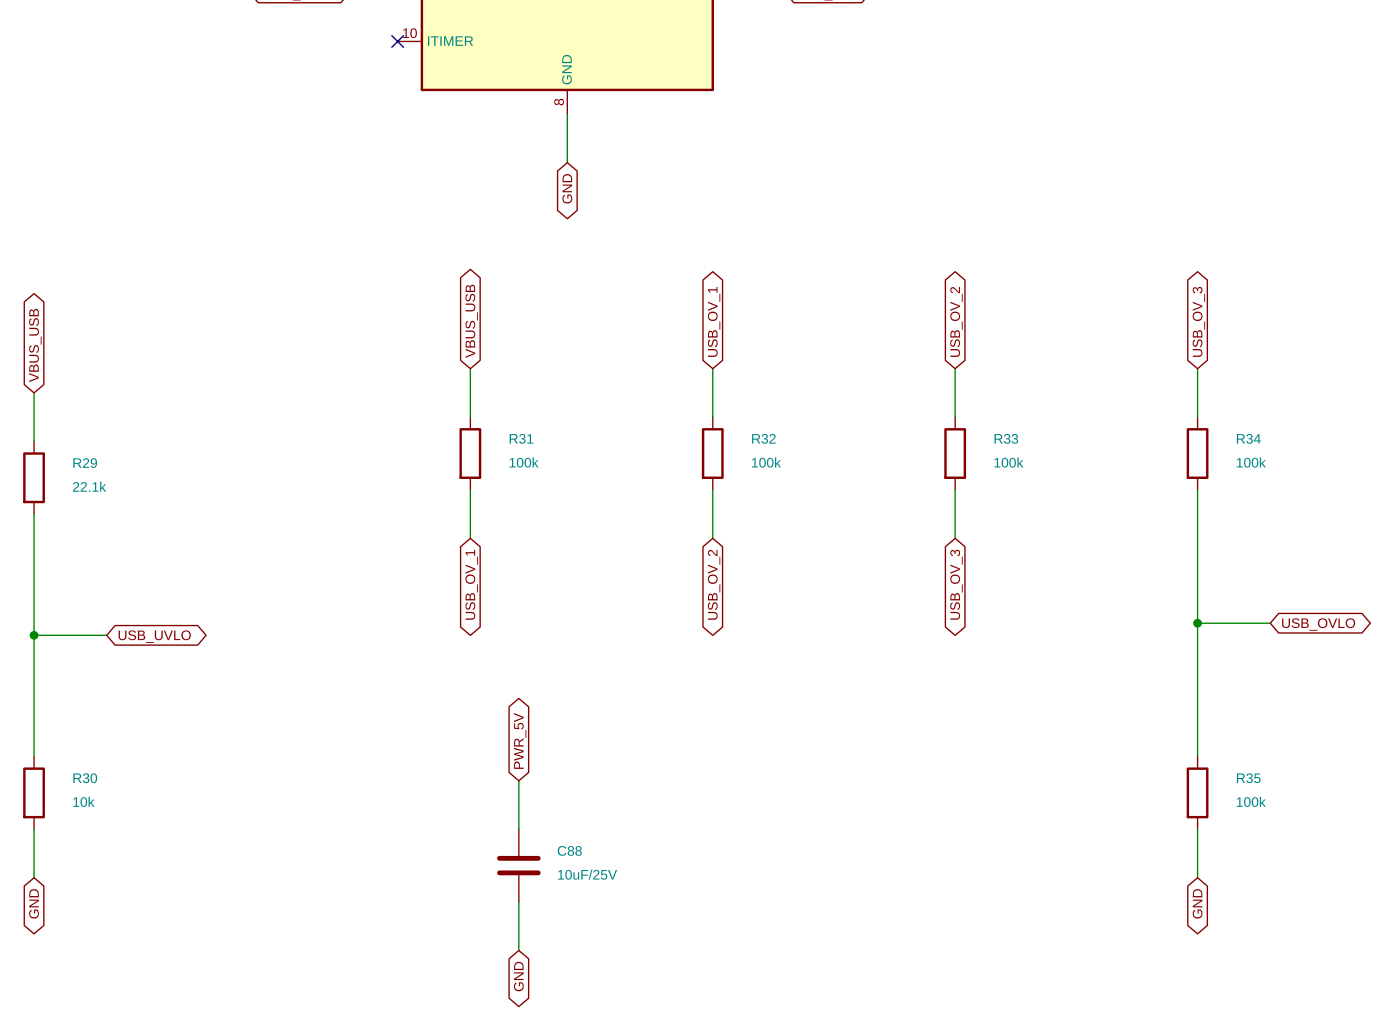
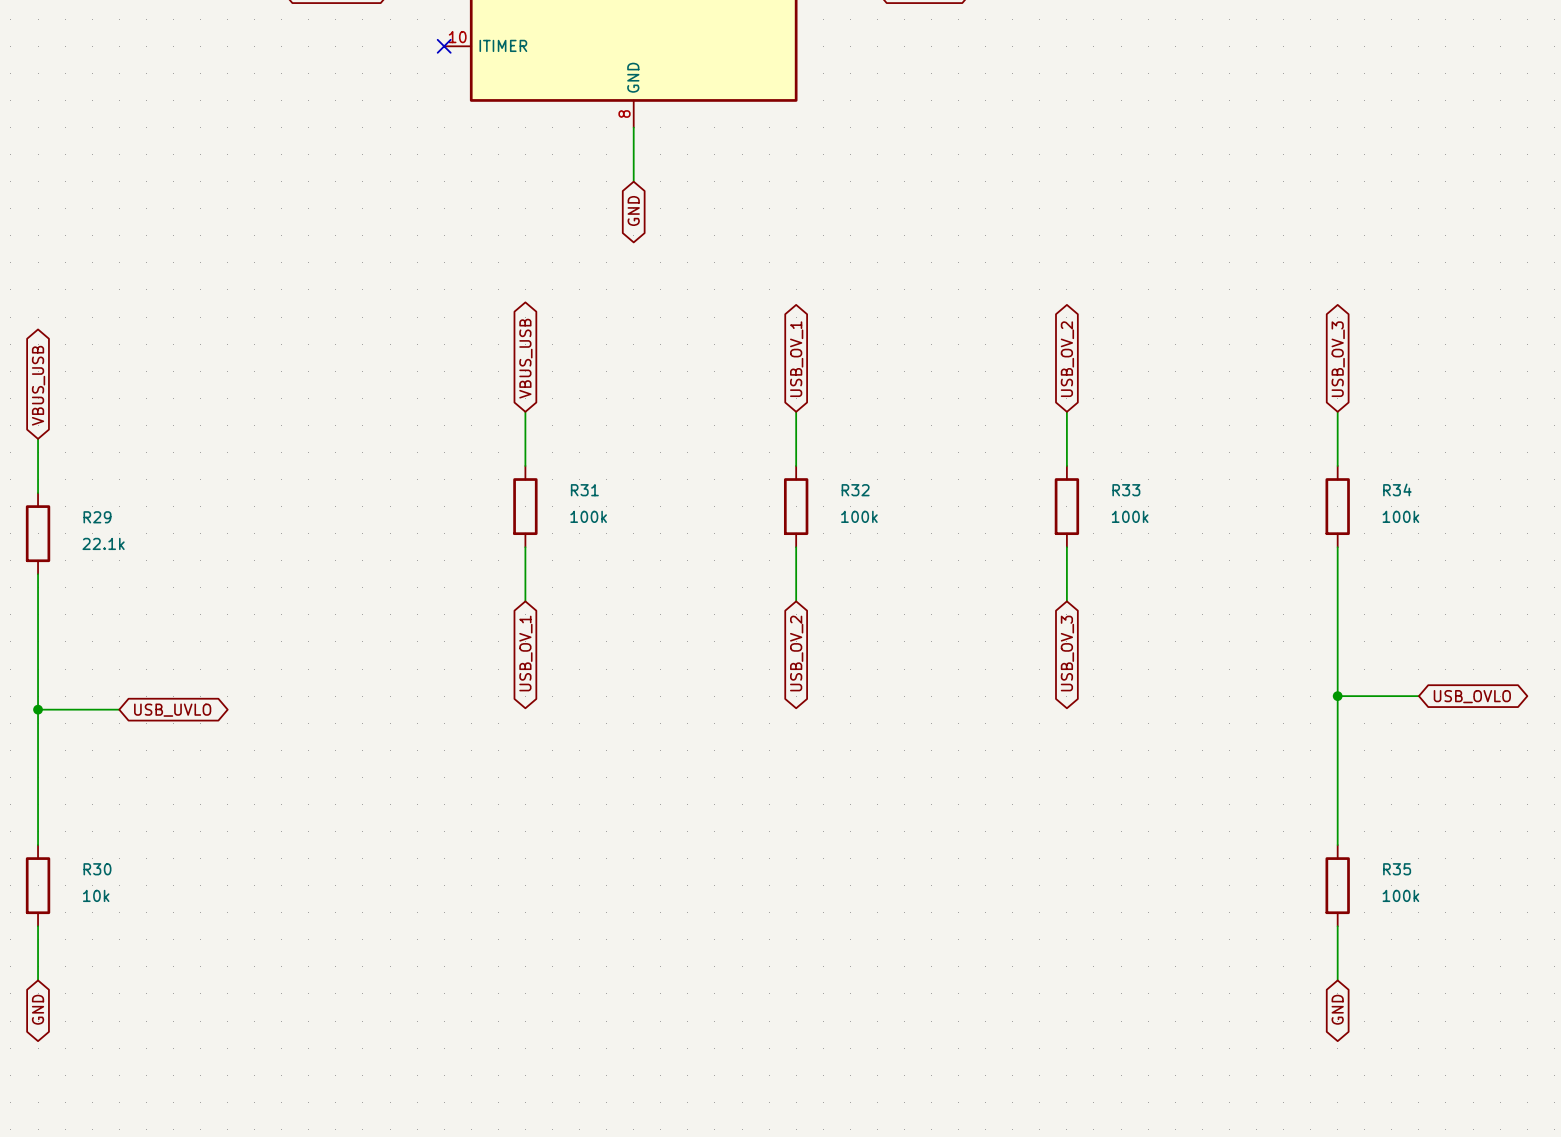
global label: PWR_5V (520, 740) -> none
wire: (518, 780) (518, 829) -> none
C88: 10uF/25V (518, 865) -> none
wire: (518, 901) (518, 950) -> none
global label: GND (518, 976) -> none

